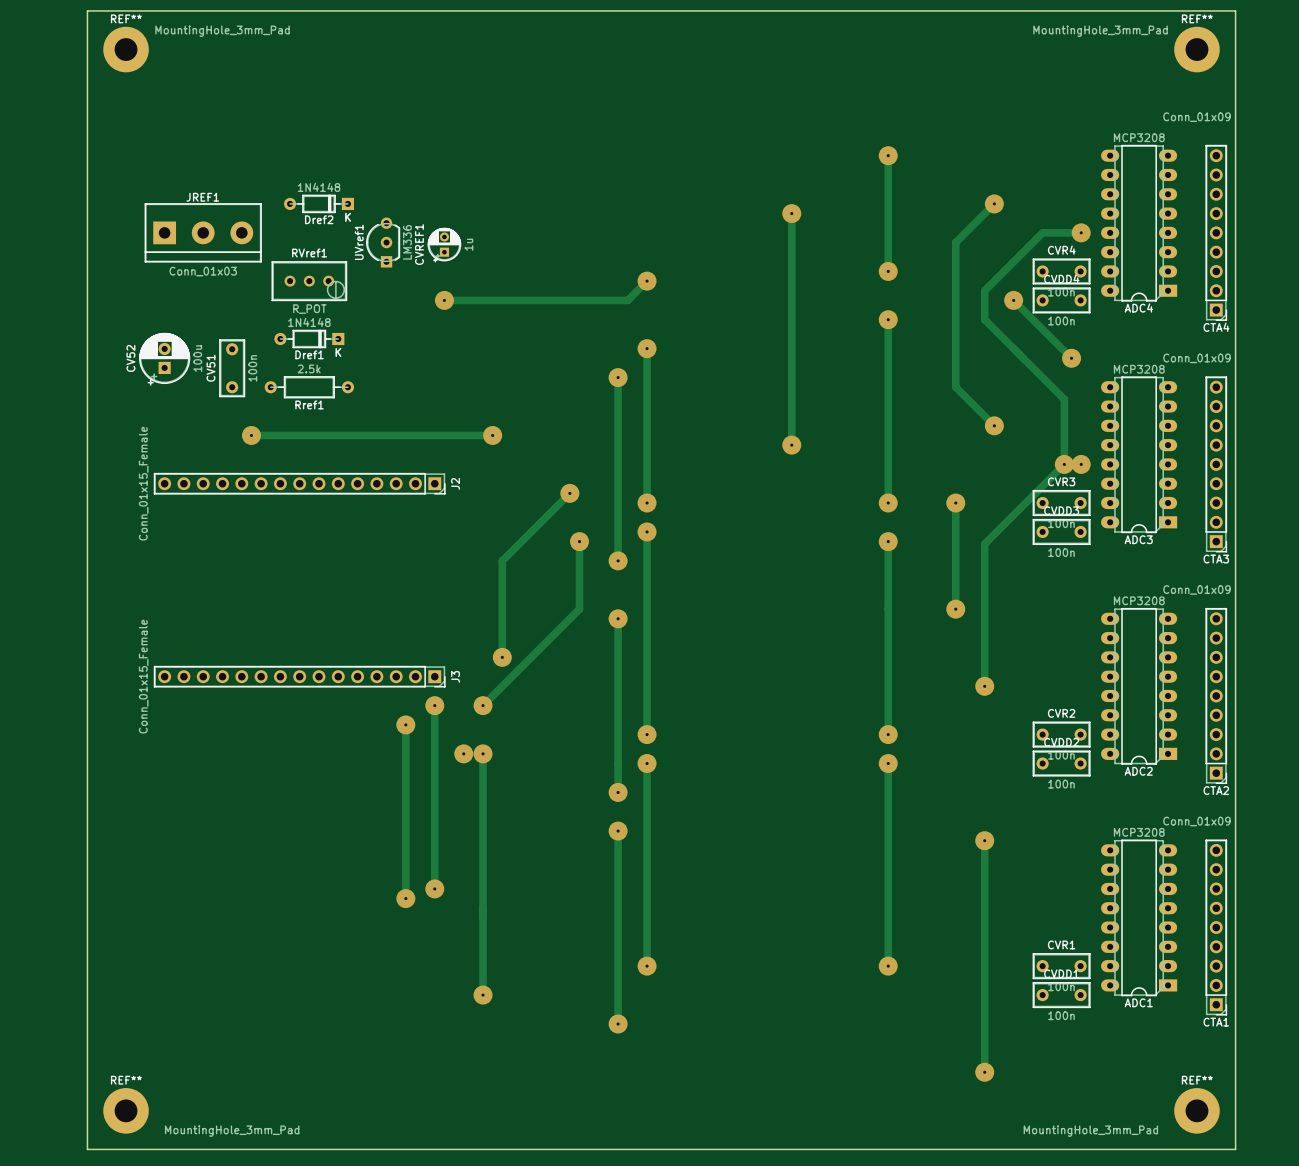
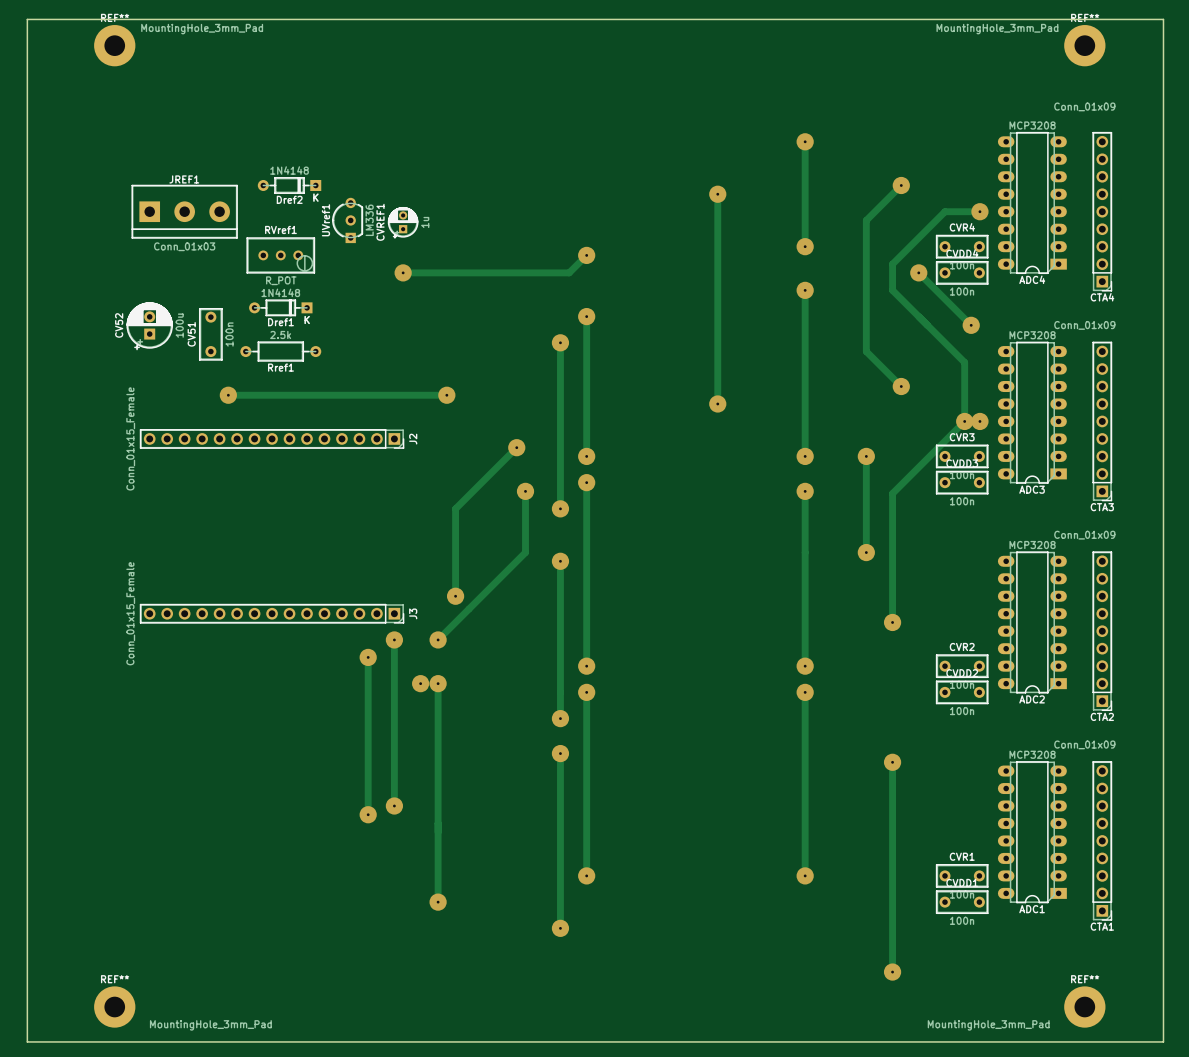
board edge: (87, 1149) (87, 10) (1235, 10) (1235, 1149) -> (79, 1041) (27, 1041) (27, 19) (1163, 19) (1163, 1041) (1119, 1041)

